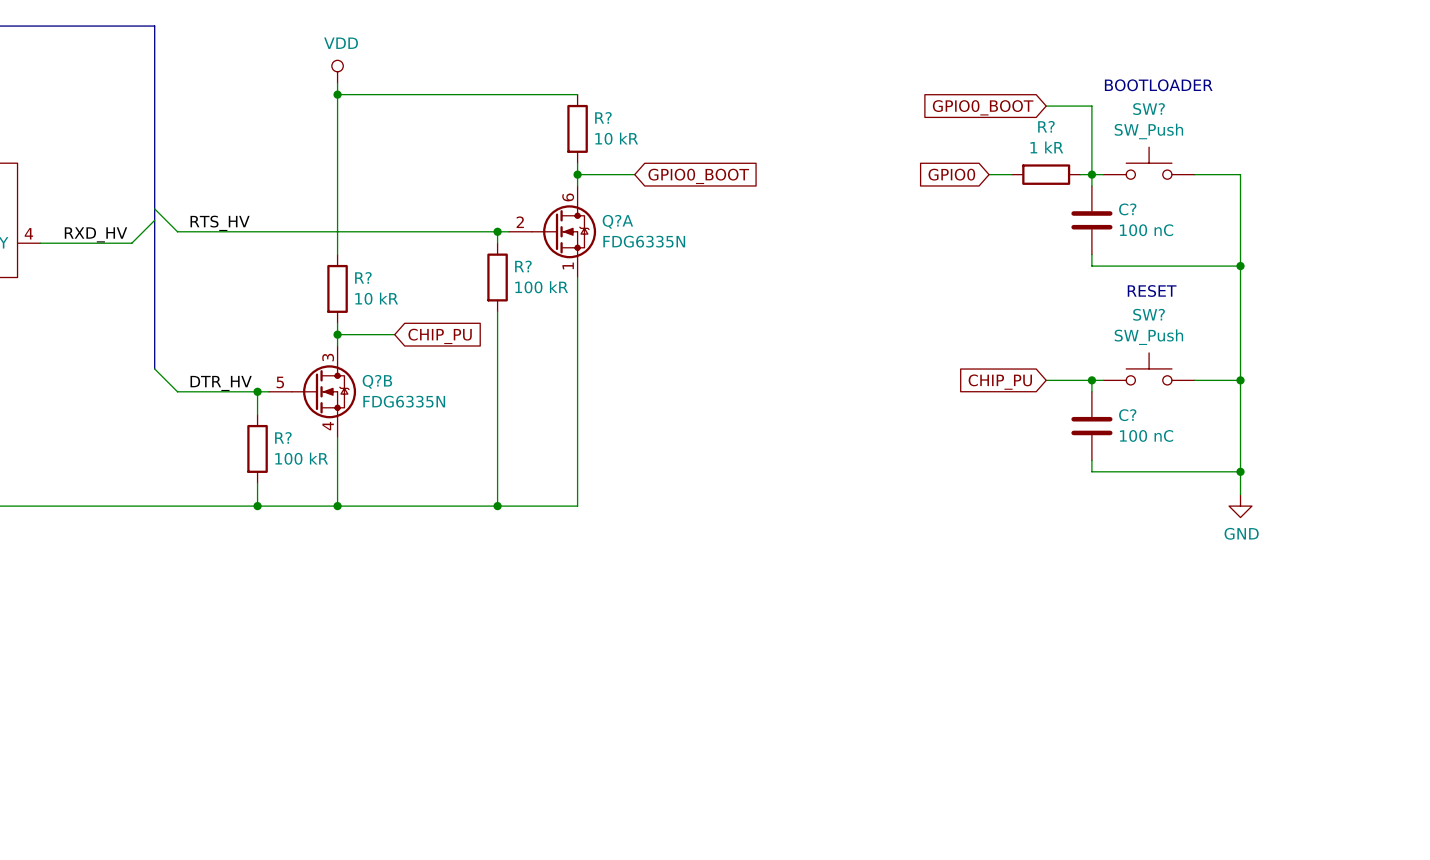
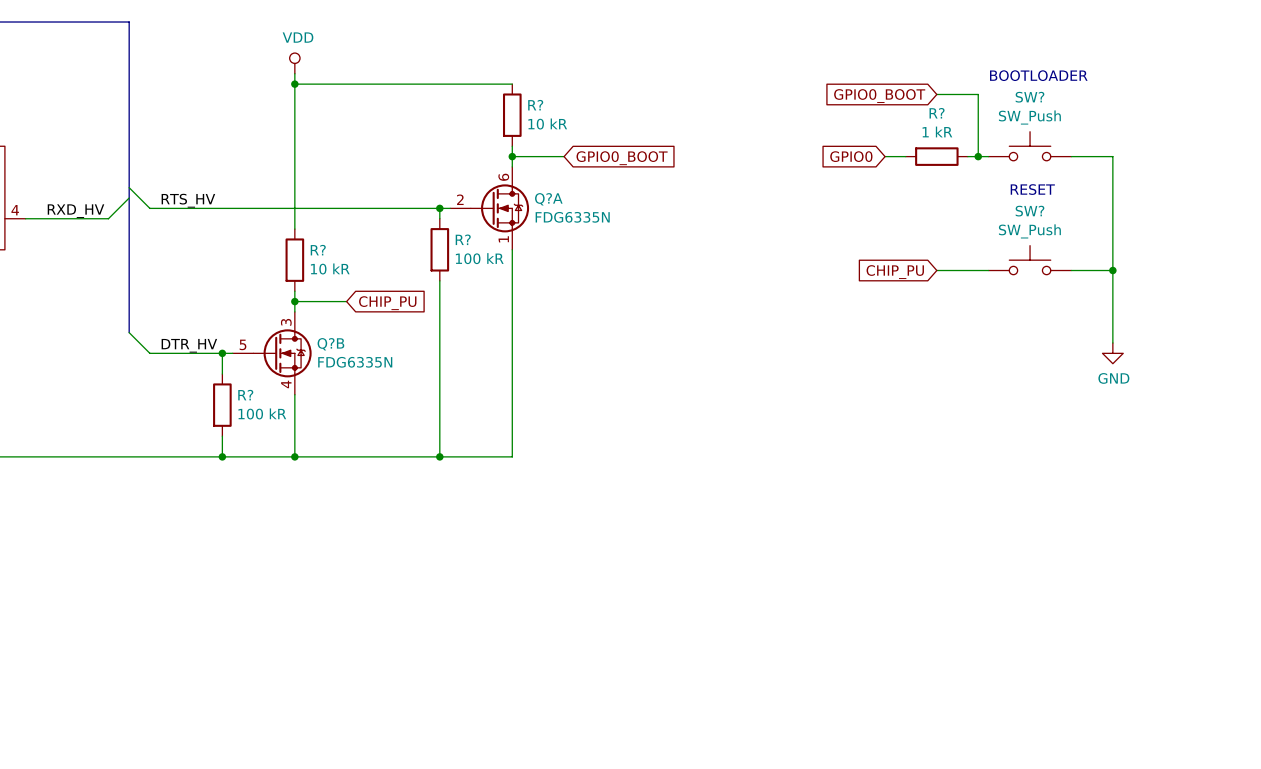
wire: (1091, 174) (1091, 186) -> none
C?: 100 nC (1091, 220) -> none
wire: (1091, 254) (1091, 266) (1240, 266) -> none
junction position: (1240, 266) -> (1112, 270)
text position: RESET (1152, 291) -> RESET (1032, 189)
wire: none -> (1071, 270) (1112, 270)
SW? position: (1149, 368) -> (1030, 260)
wire: (1046, 380) (1103, 380) -> (936, 270) (988, 270)
wire: (1091, 380) (1091, 391) -> none
junction: (1091, 380) -> none
wire: (1194, 380) (1240, 380) (1240, 494) -> none
junction: (1240, 380) -> none
global label position: CHIP_PU (1000, 382) -> CHIP_PU (895, 272)
C?: 100 nC (1091, 426) -> none
wire: (1091, 460) (1091, 471) (1240, 471) -> none
junction: (1240, 471) -> none
power symbol position: GND (1240, 506) -> GND (1112, 353)

